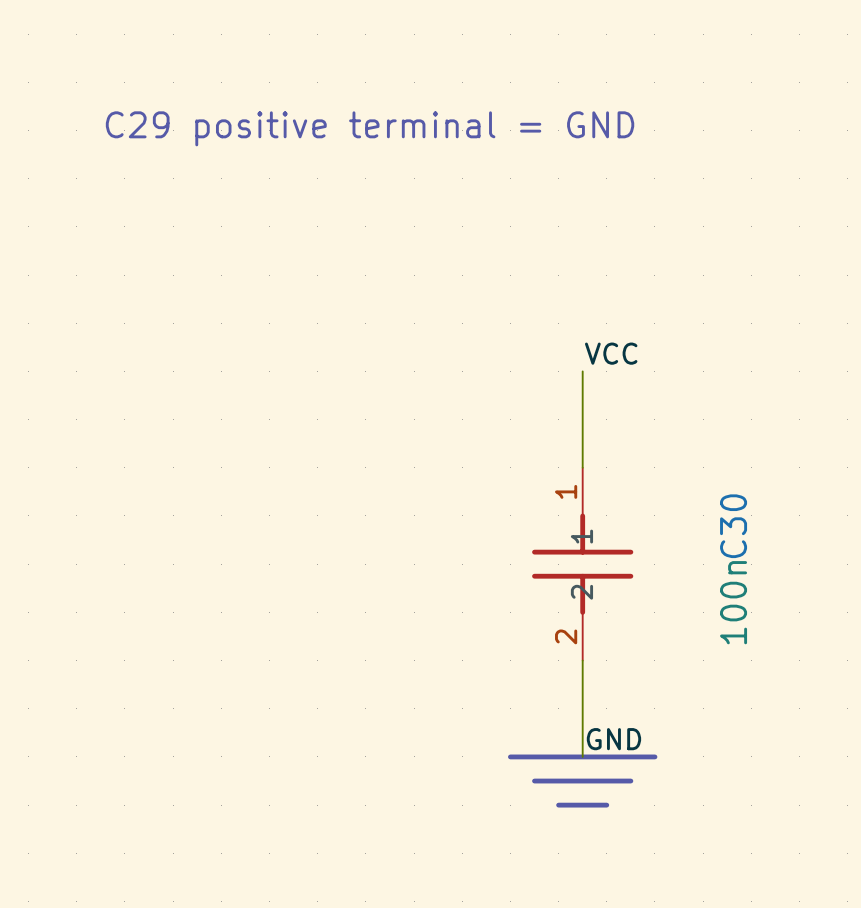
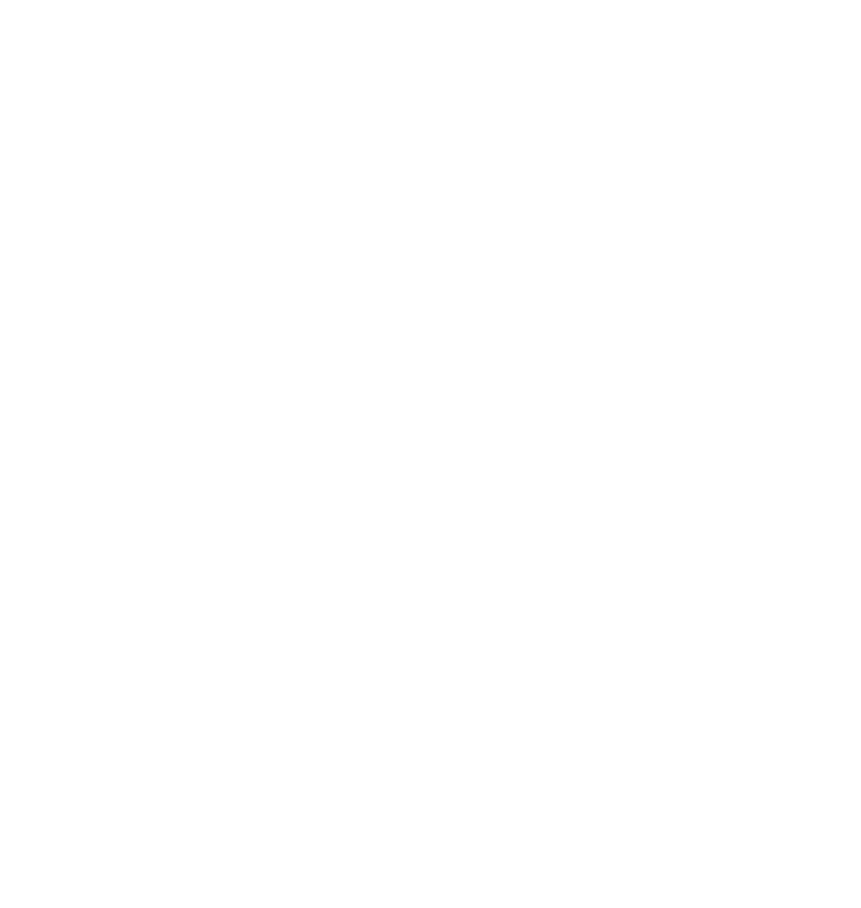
text: C29 positive terminal = GND (370, 128) -> none
label: VCC (611, 353) -> none
wire: (582, 371) (582, 467) -> none
C30: 100n (582, 564) -> none
wire: (582, 660) (582, 756) -> none
label: GND (613, 739) -> none
line: (510, 756) (654, 756) -> none
line: (534, 781) (630, 781) -> none
line: (558, 805) (606, 805) -> none

